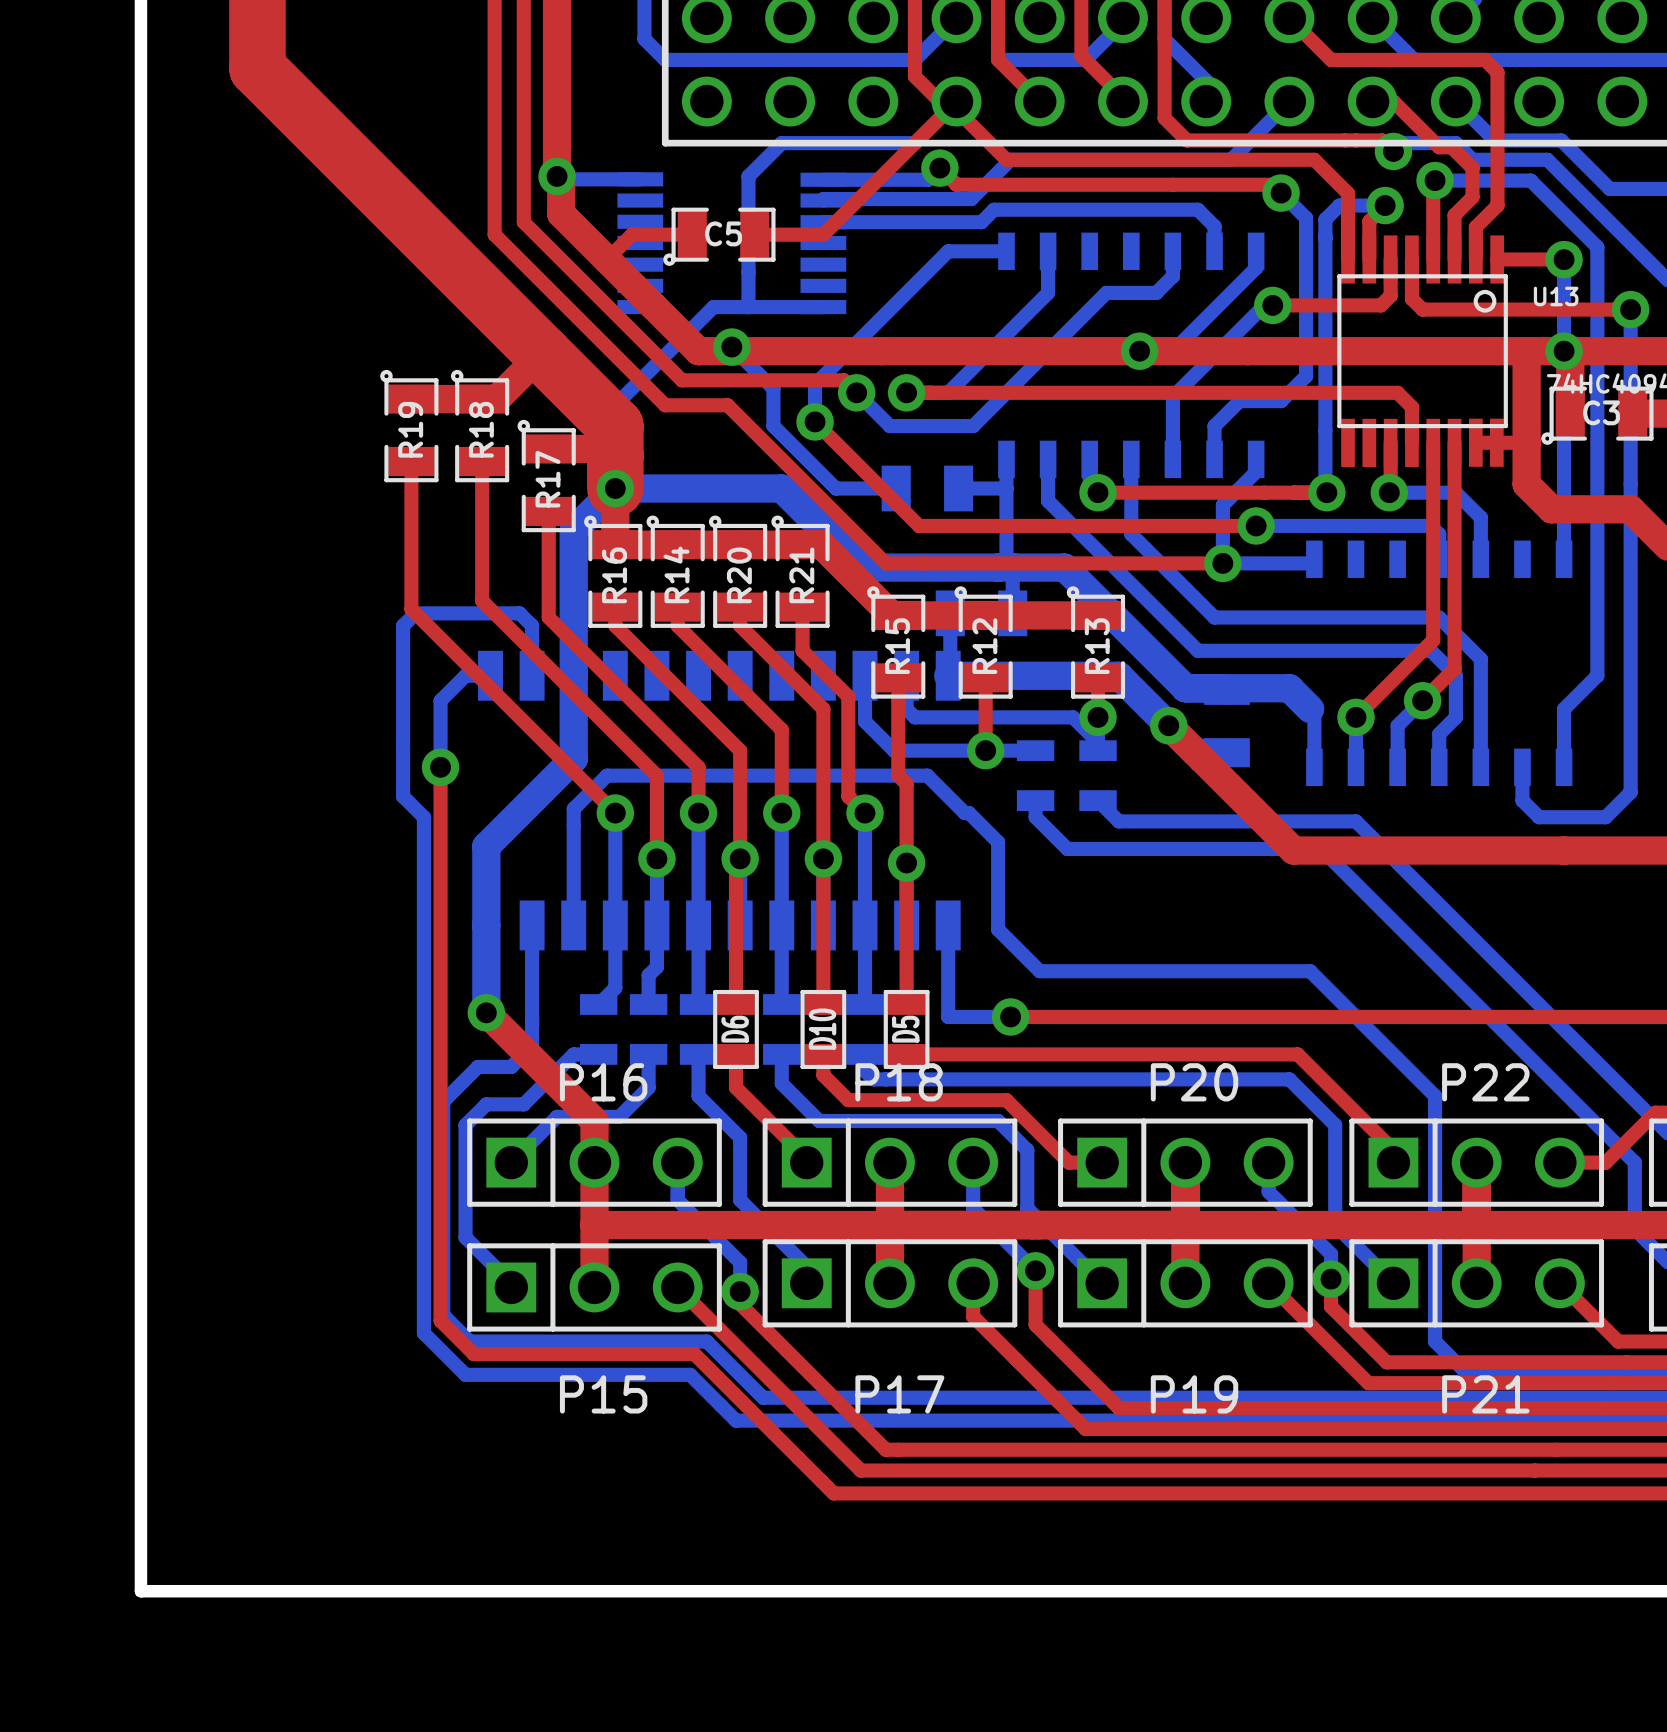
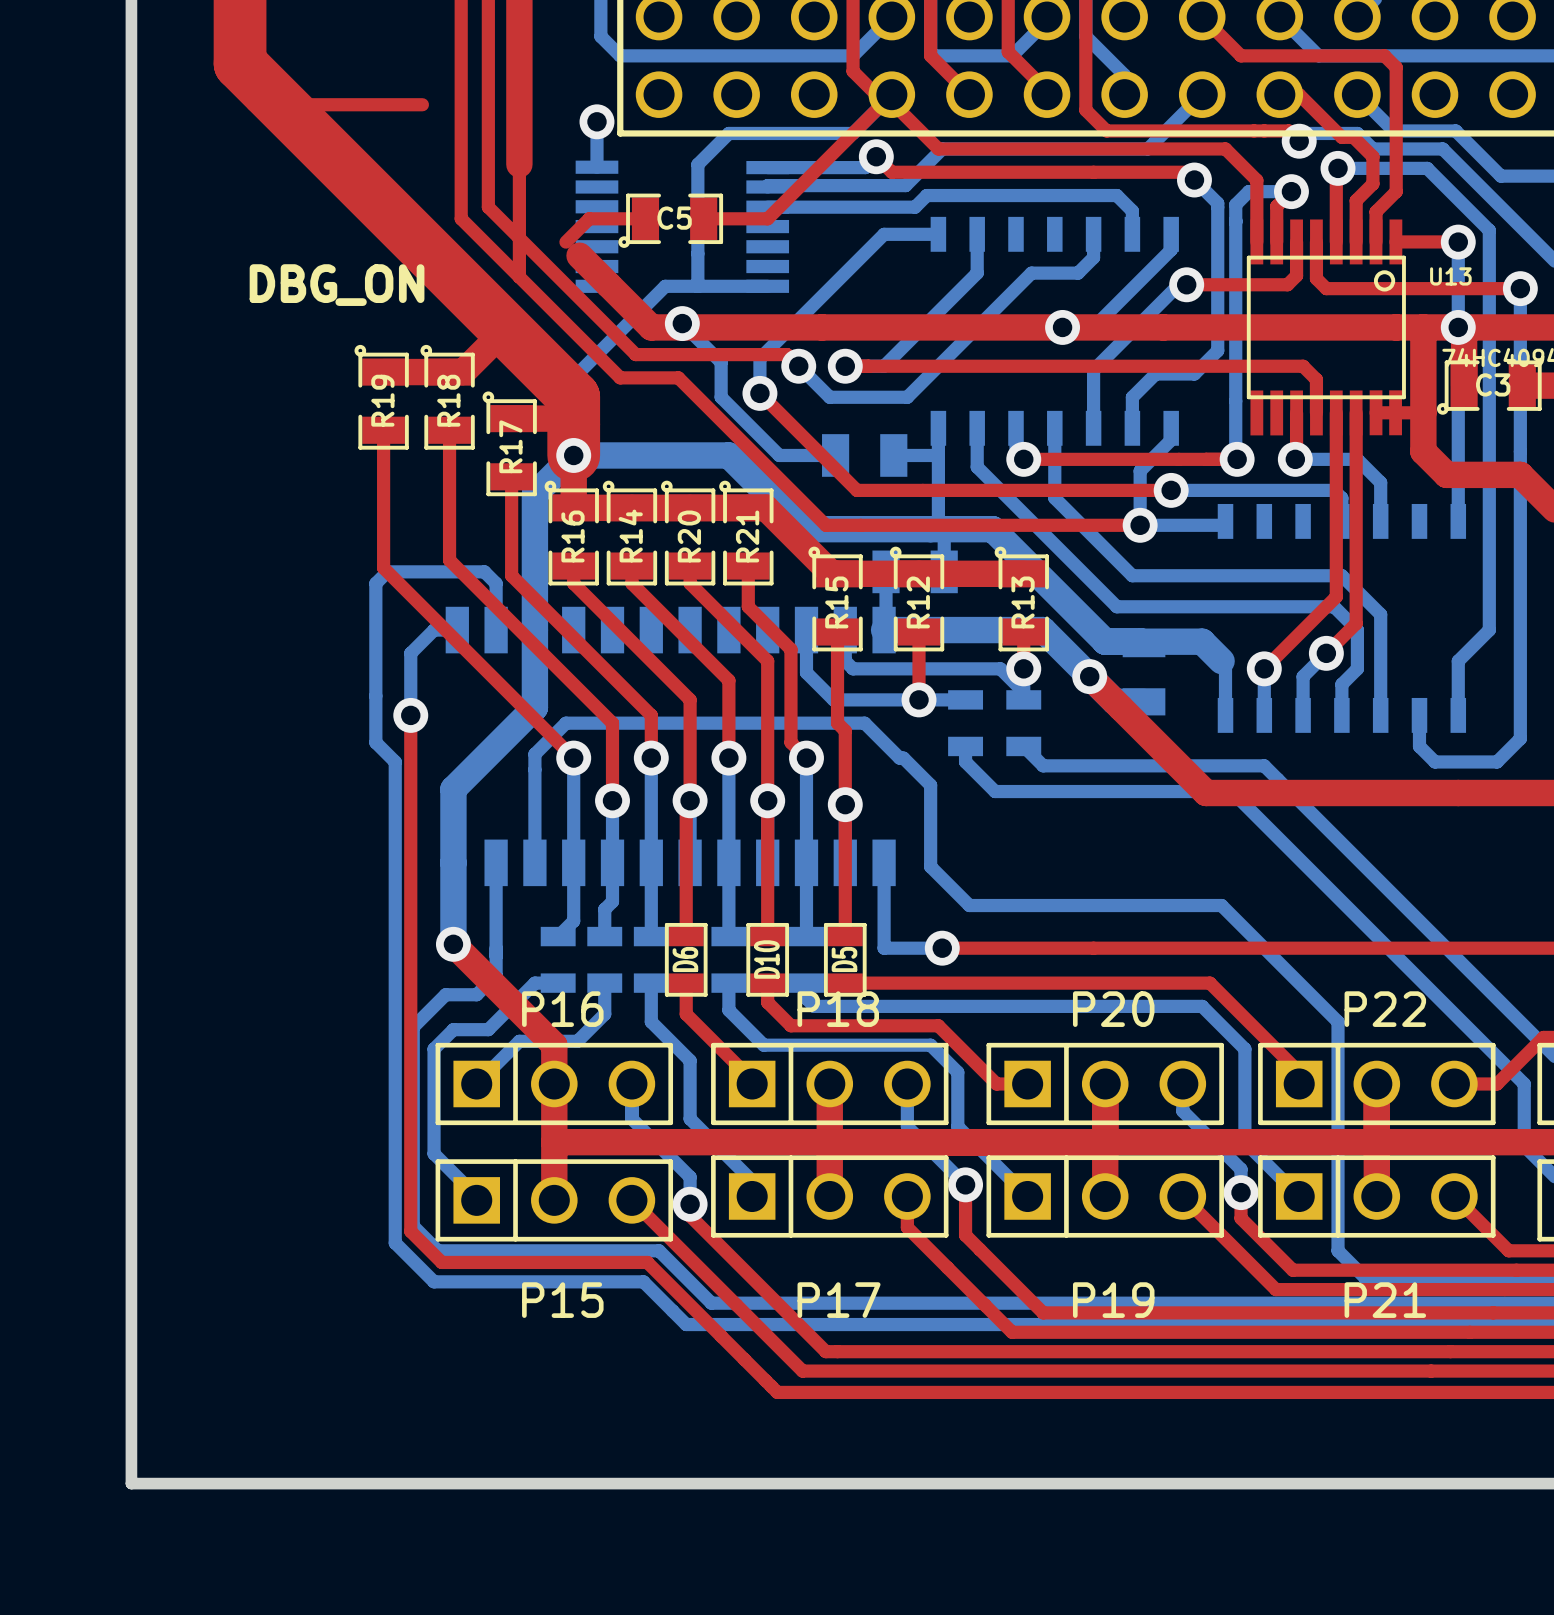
top track: none -> (253, 104) (422, 104)
top track: (557, 176) (561, 180) (561, 213) (621, 274) -> (519, 164) (519, 277)
bottom track: (557, 176) (559, 179) (640, 179) -> (596, 121) (596, 167)
via position: (557, 176) -> (596, 121)
text: none -> DBG_ON (337, 285)

